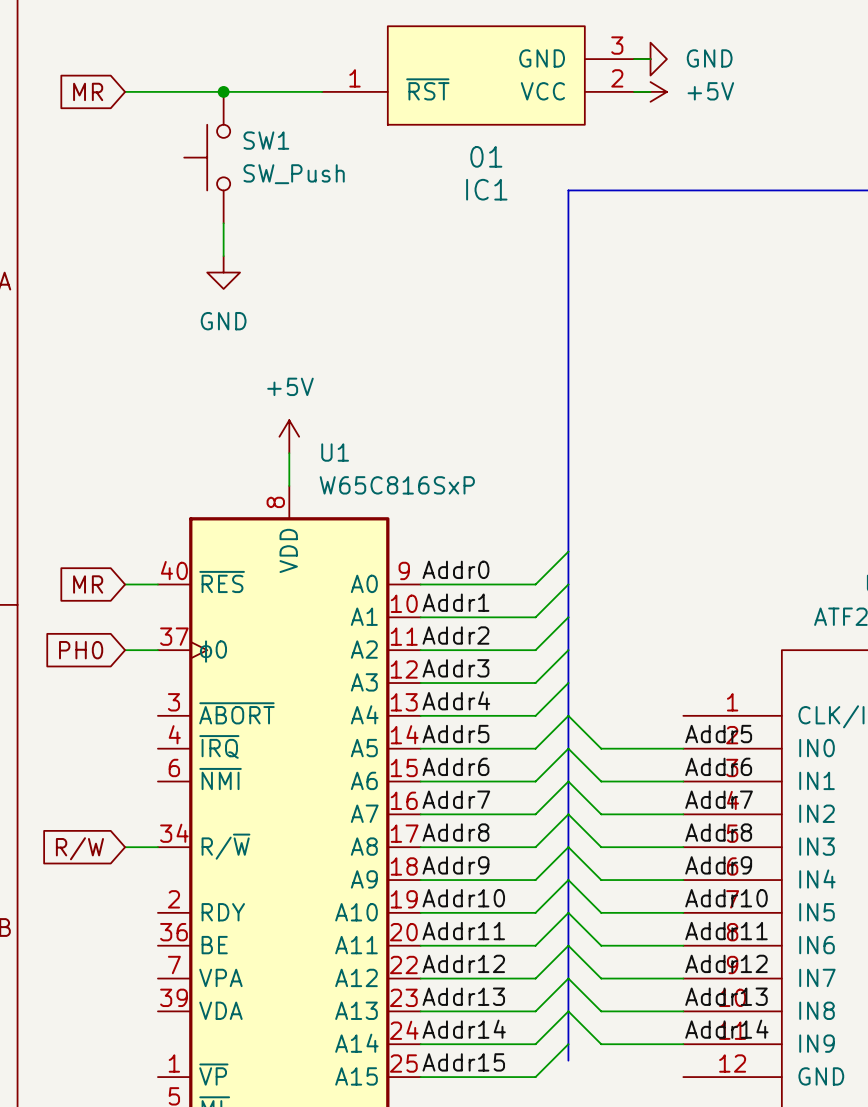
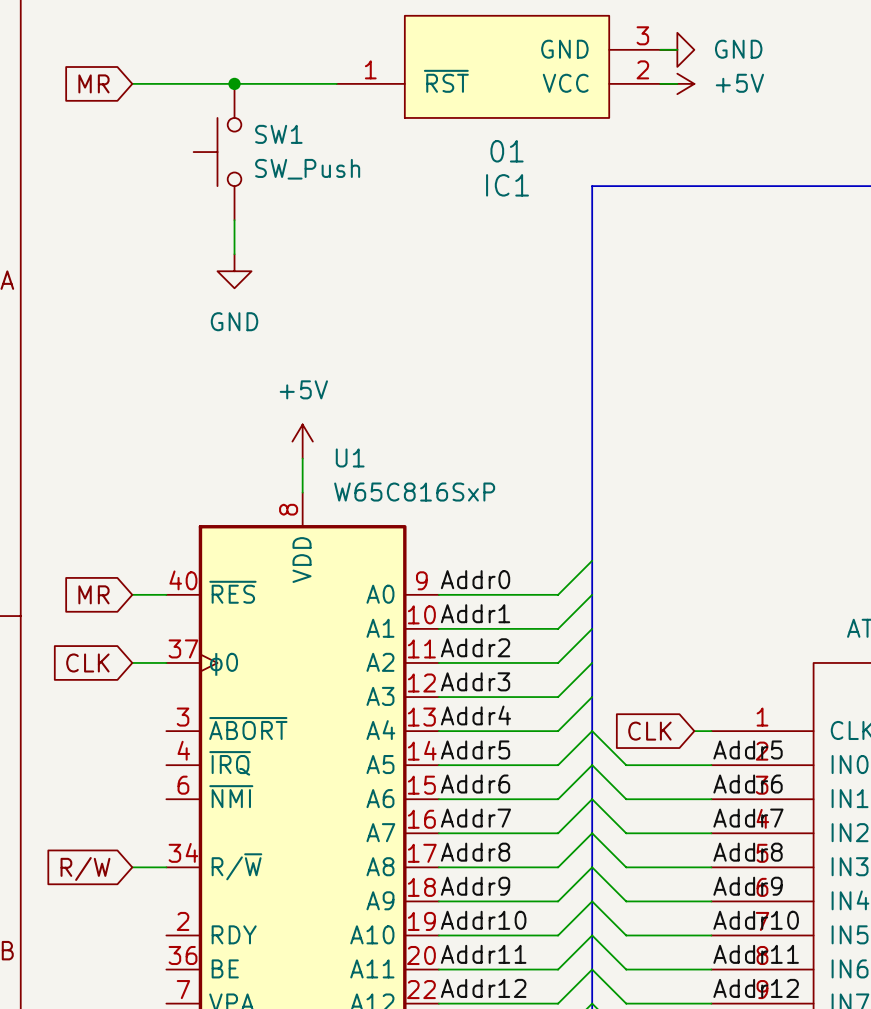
global label: PH0 (81, 650) -> CLK (87, 662)
global label: none -> CLK (649, 731)
wire: none -> (694, 731) (711, 731)

